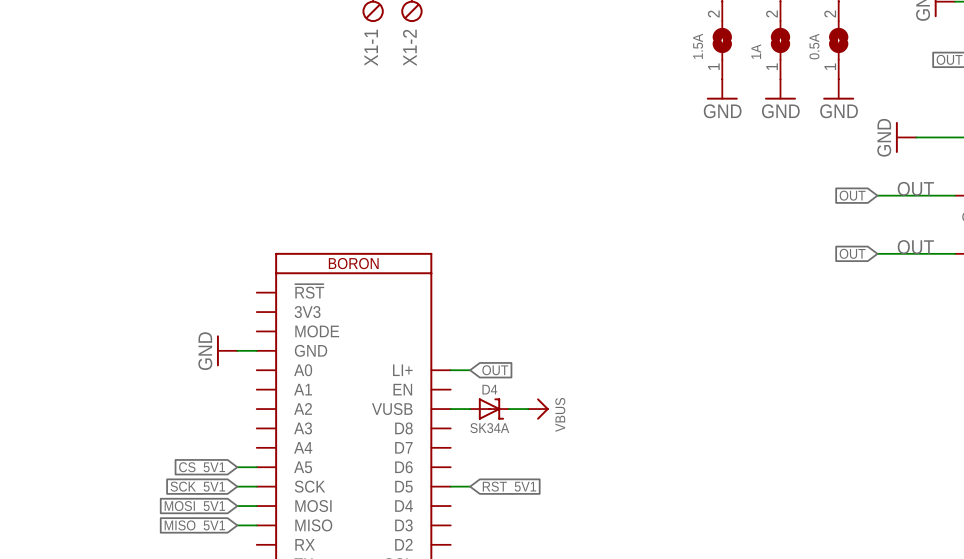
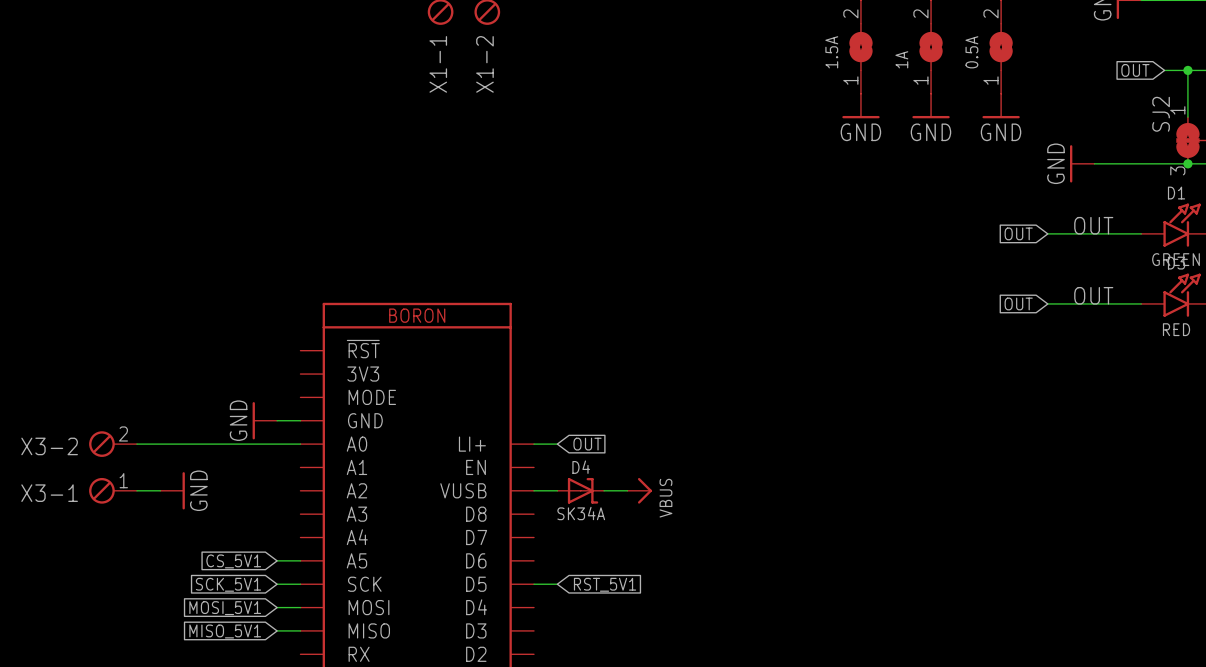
X3-2: none -> (113, 444)
wire: none -> (136, 444) (300, 444)
X3-1: none -> (113, 490)
wire: none -> (136, 490) (160, 490)
power symbol: none -> GND (172, 490)

